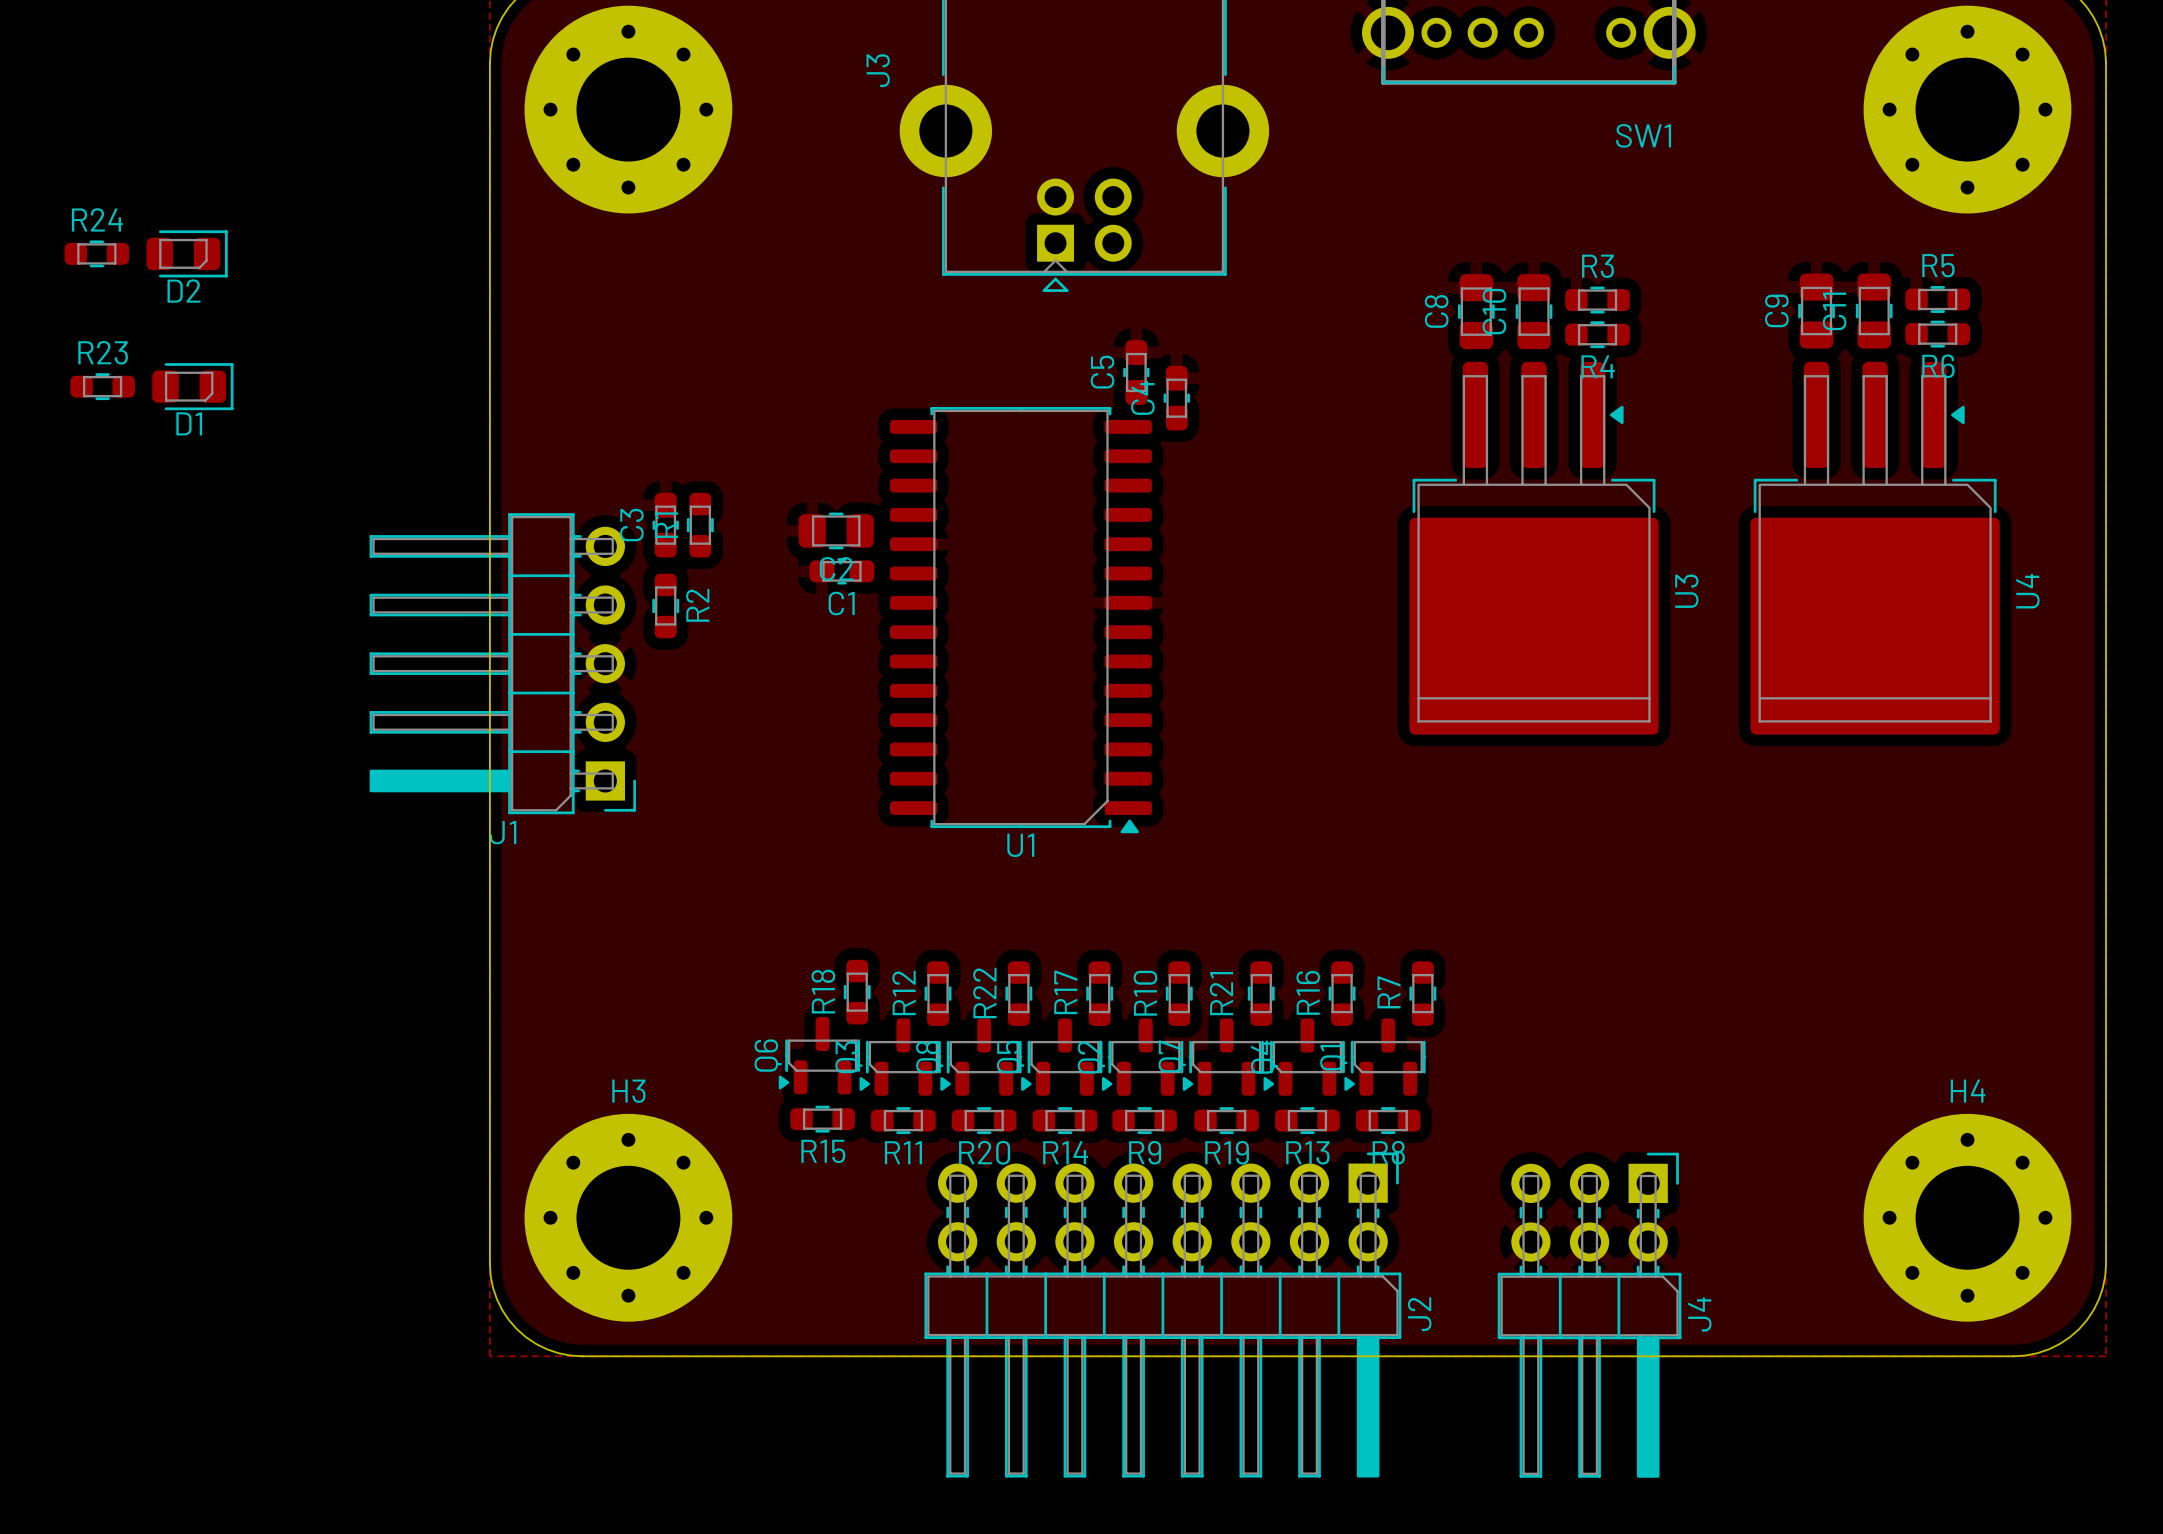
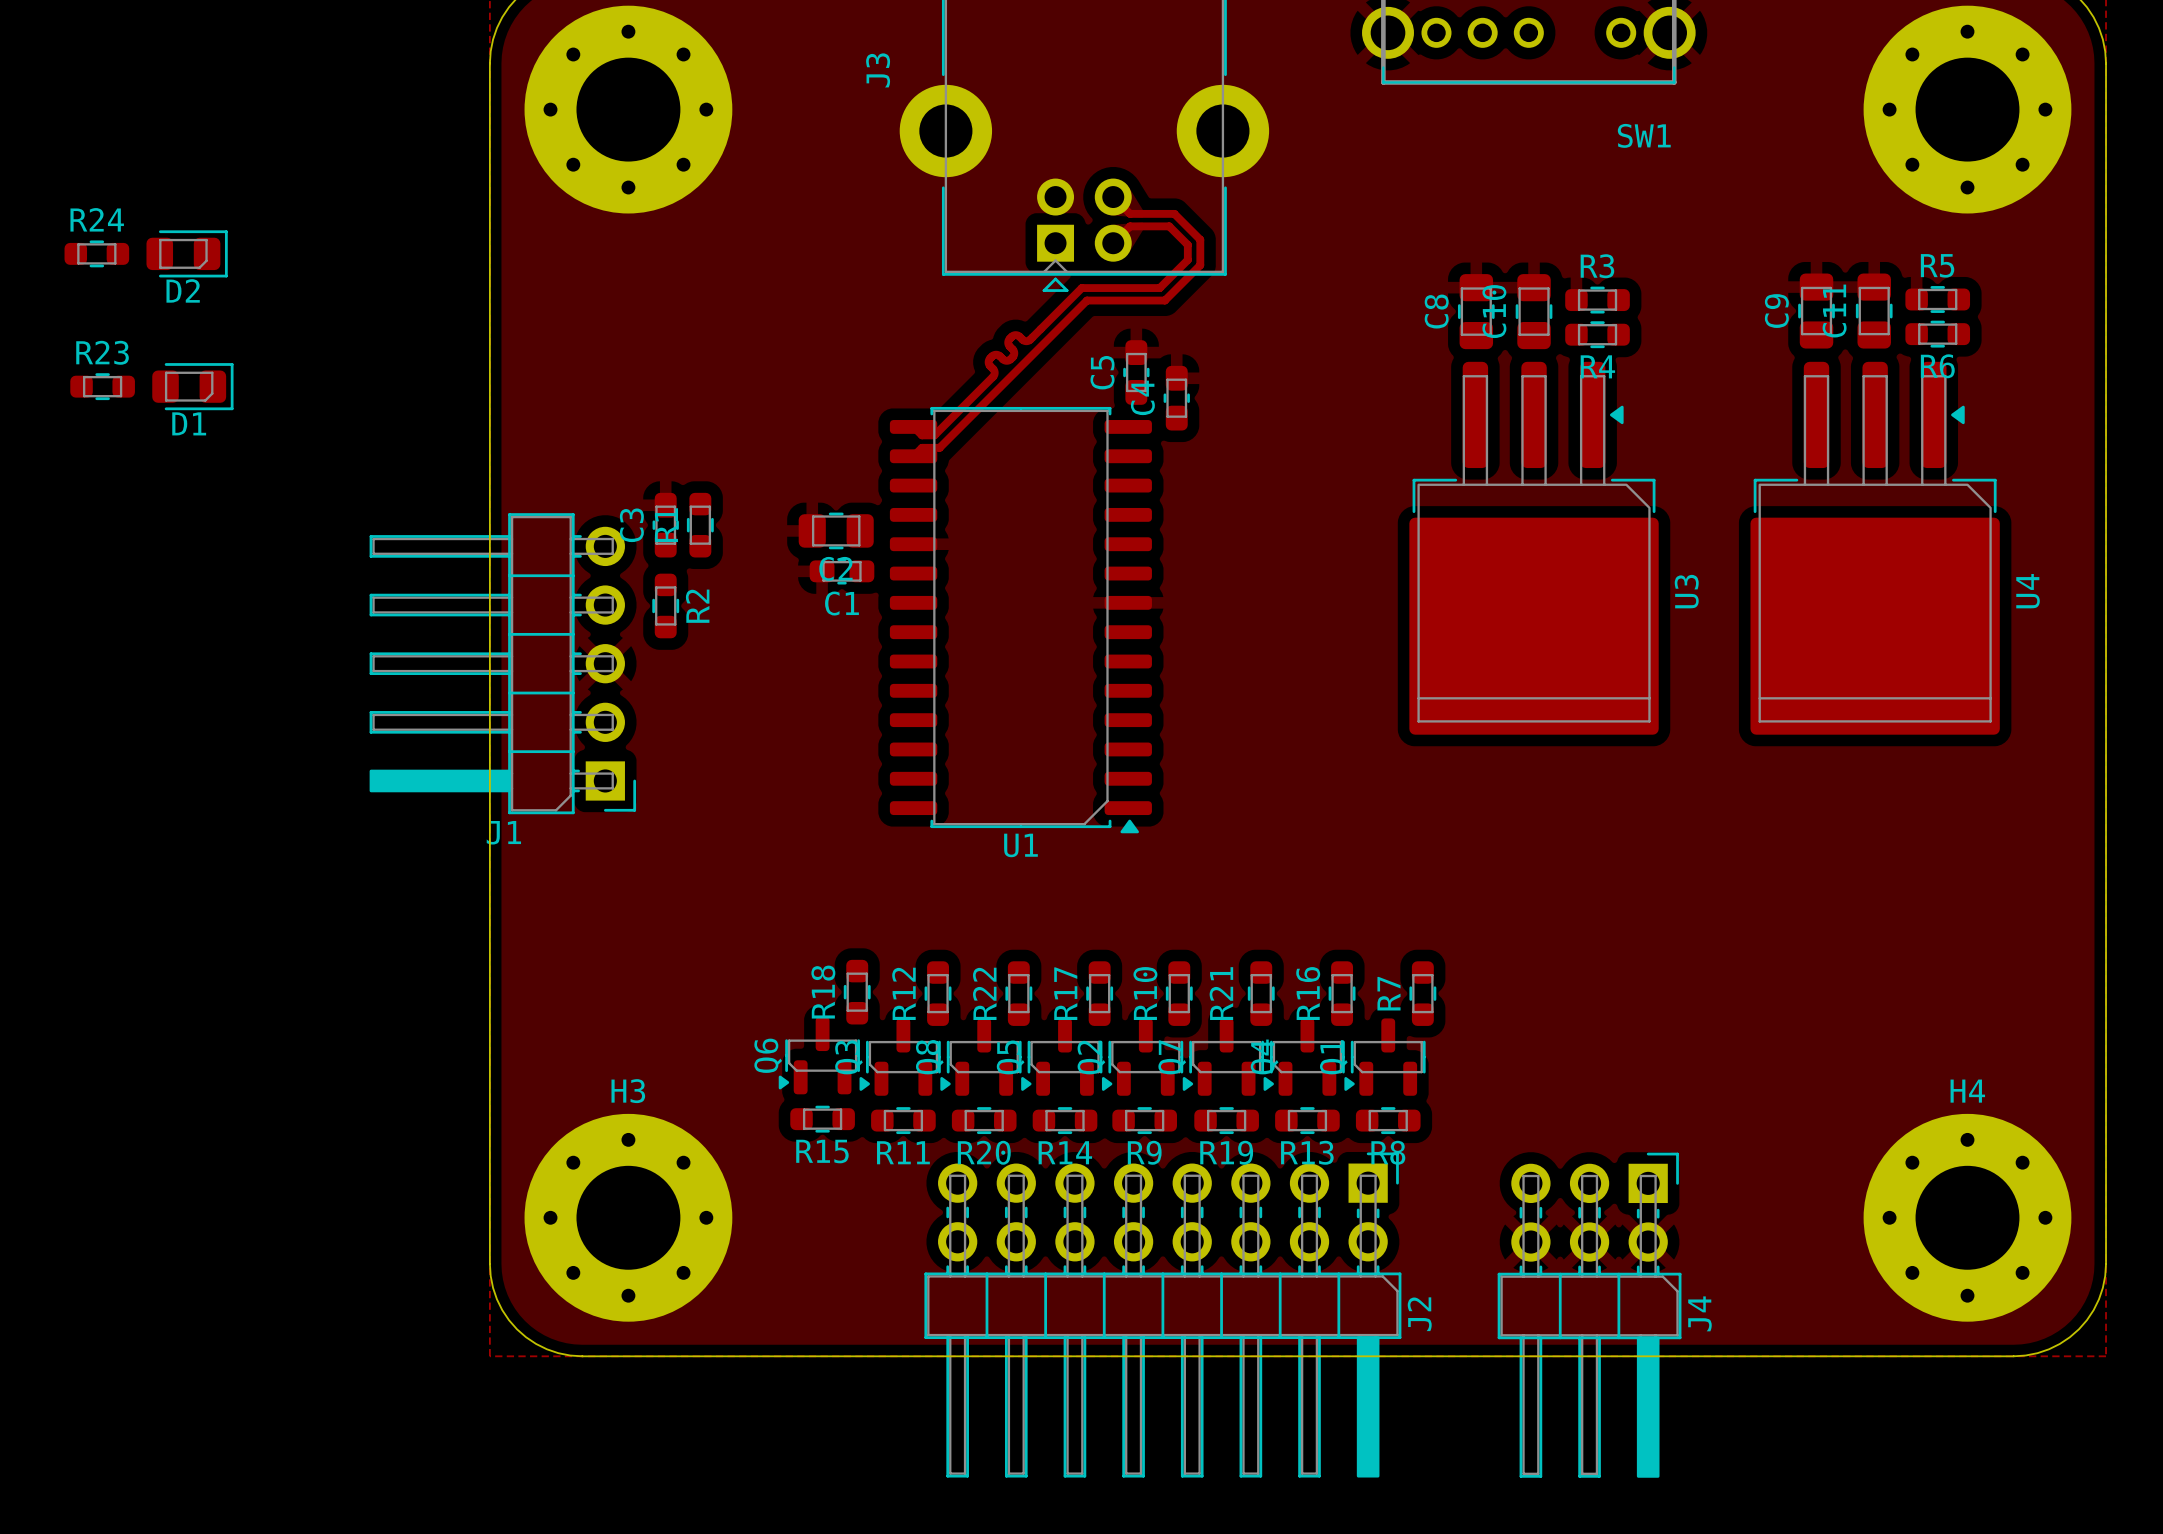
track: none -> (1113, 197) (1130, 213) (1174, 213) (1200, 239) (1200, 265) (1164, 300) (1086, 300) (939, 447) (921, 447) (913, 456)
track: none -> (1113, 243) (1130, 226) (1169, 226) (1187, 244) (1187, 260) (1159, 288) (1081, 288) (1029, 340) (1024, 340) (1016, 335) (1009, 338) (1008, 343) (1013, 351) (1013, 356) (1007, 360) (996, 354) (990, 358) (988, 362) (994, 370) (993, 376) (934, 435) (921, 435) (913, 426)

